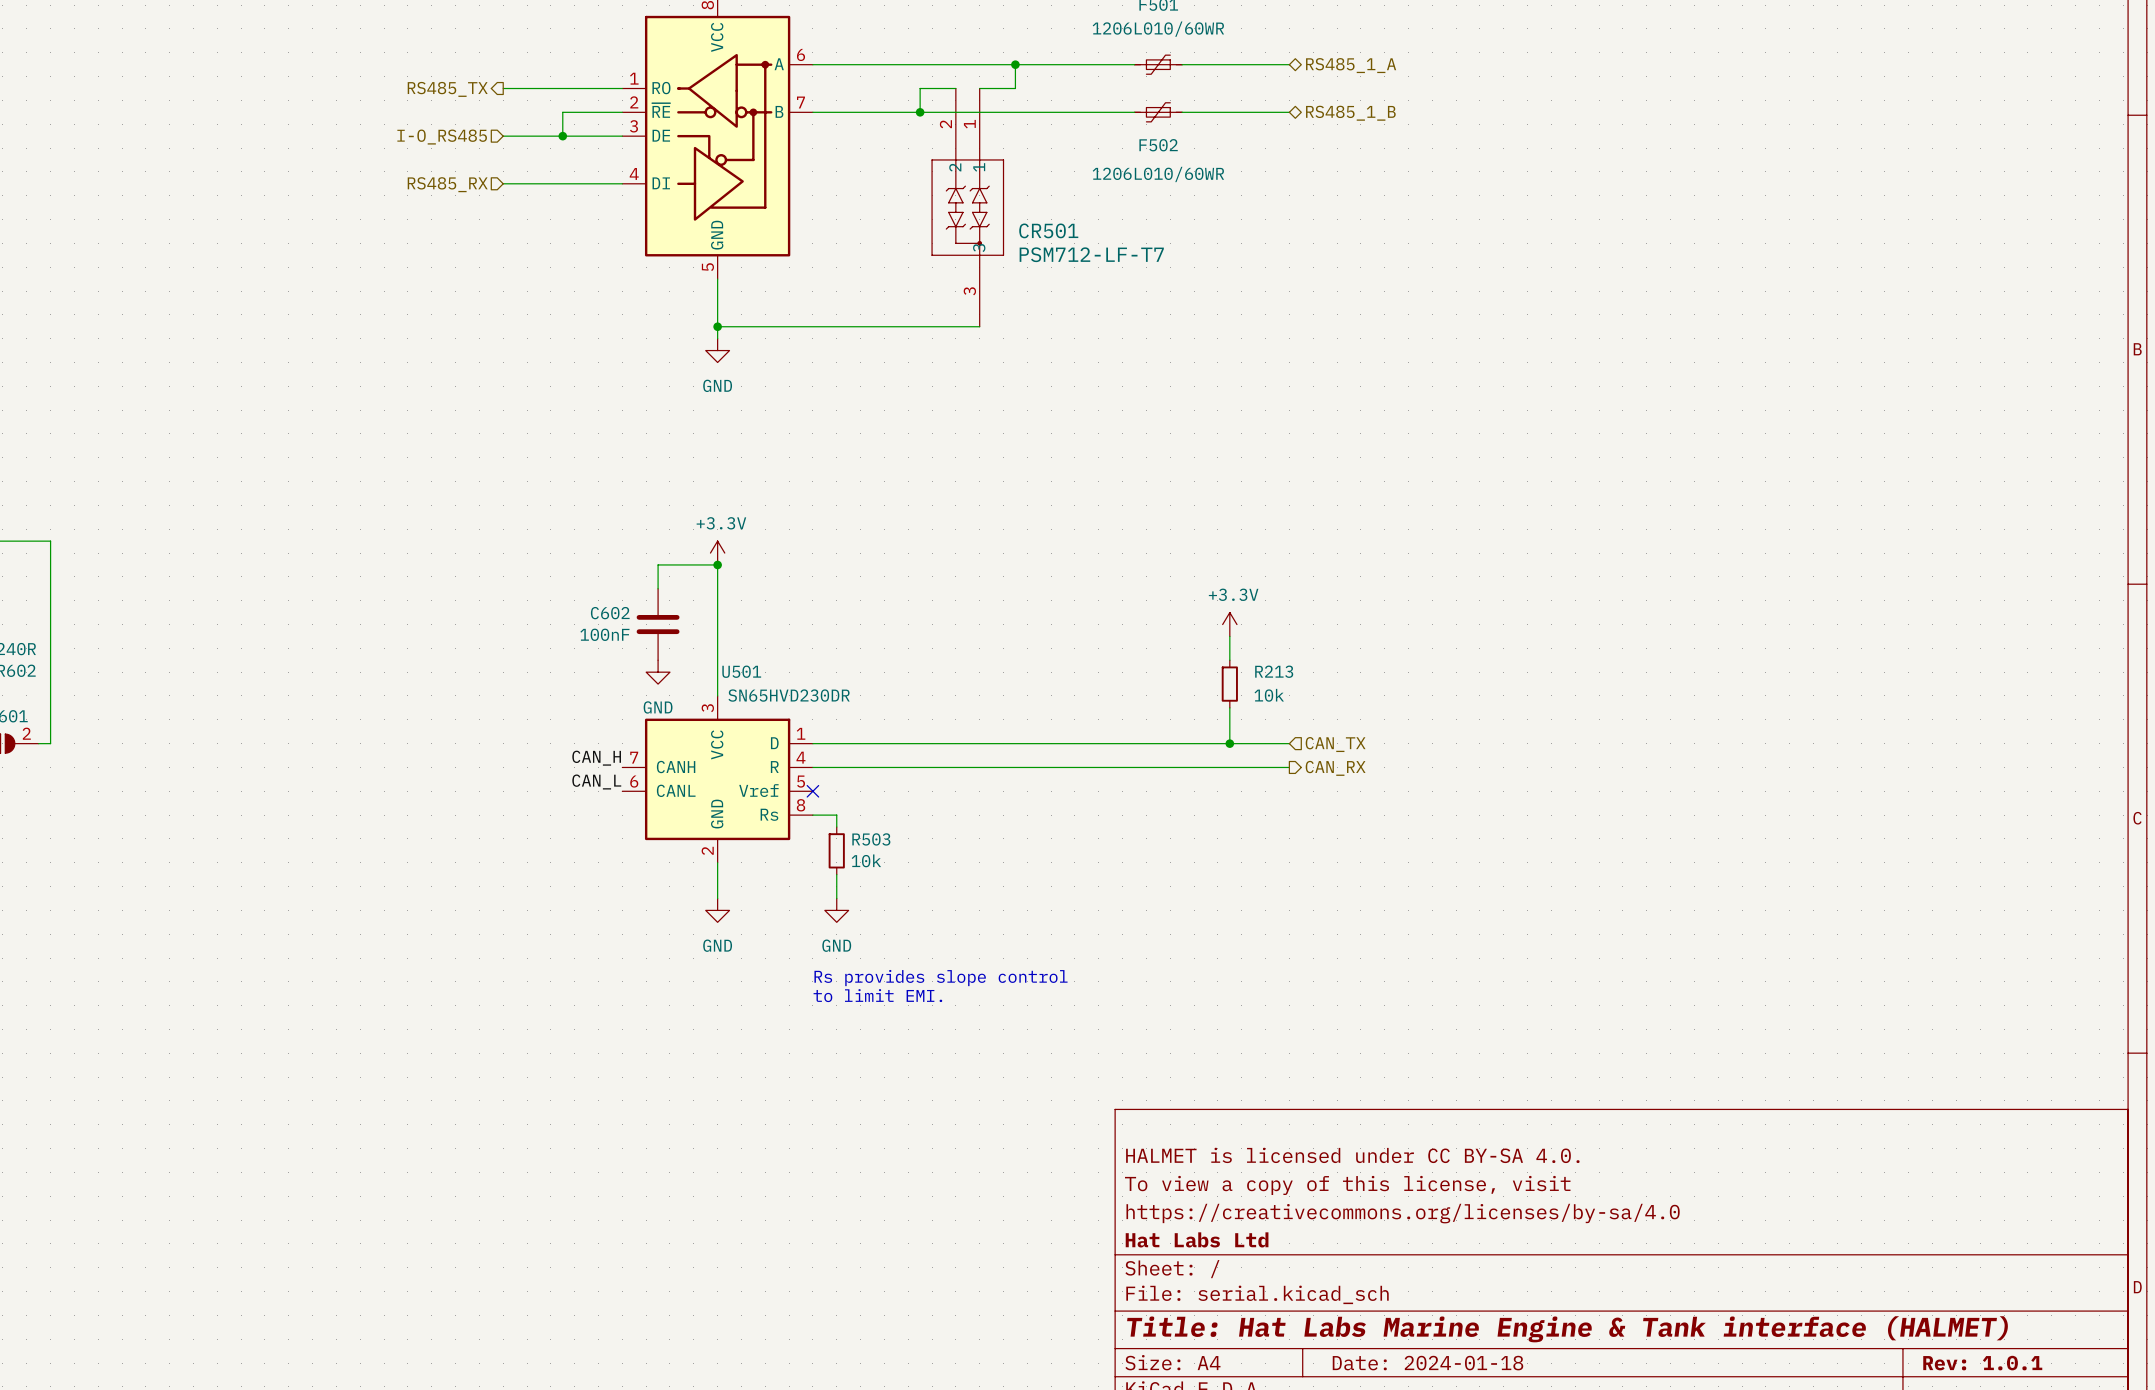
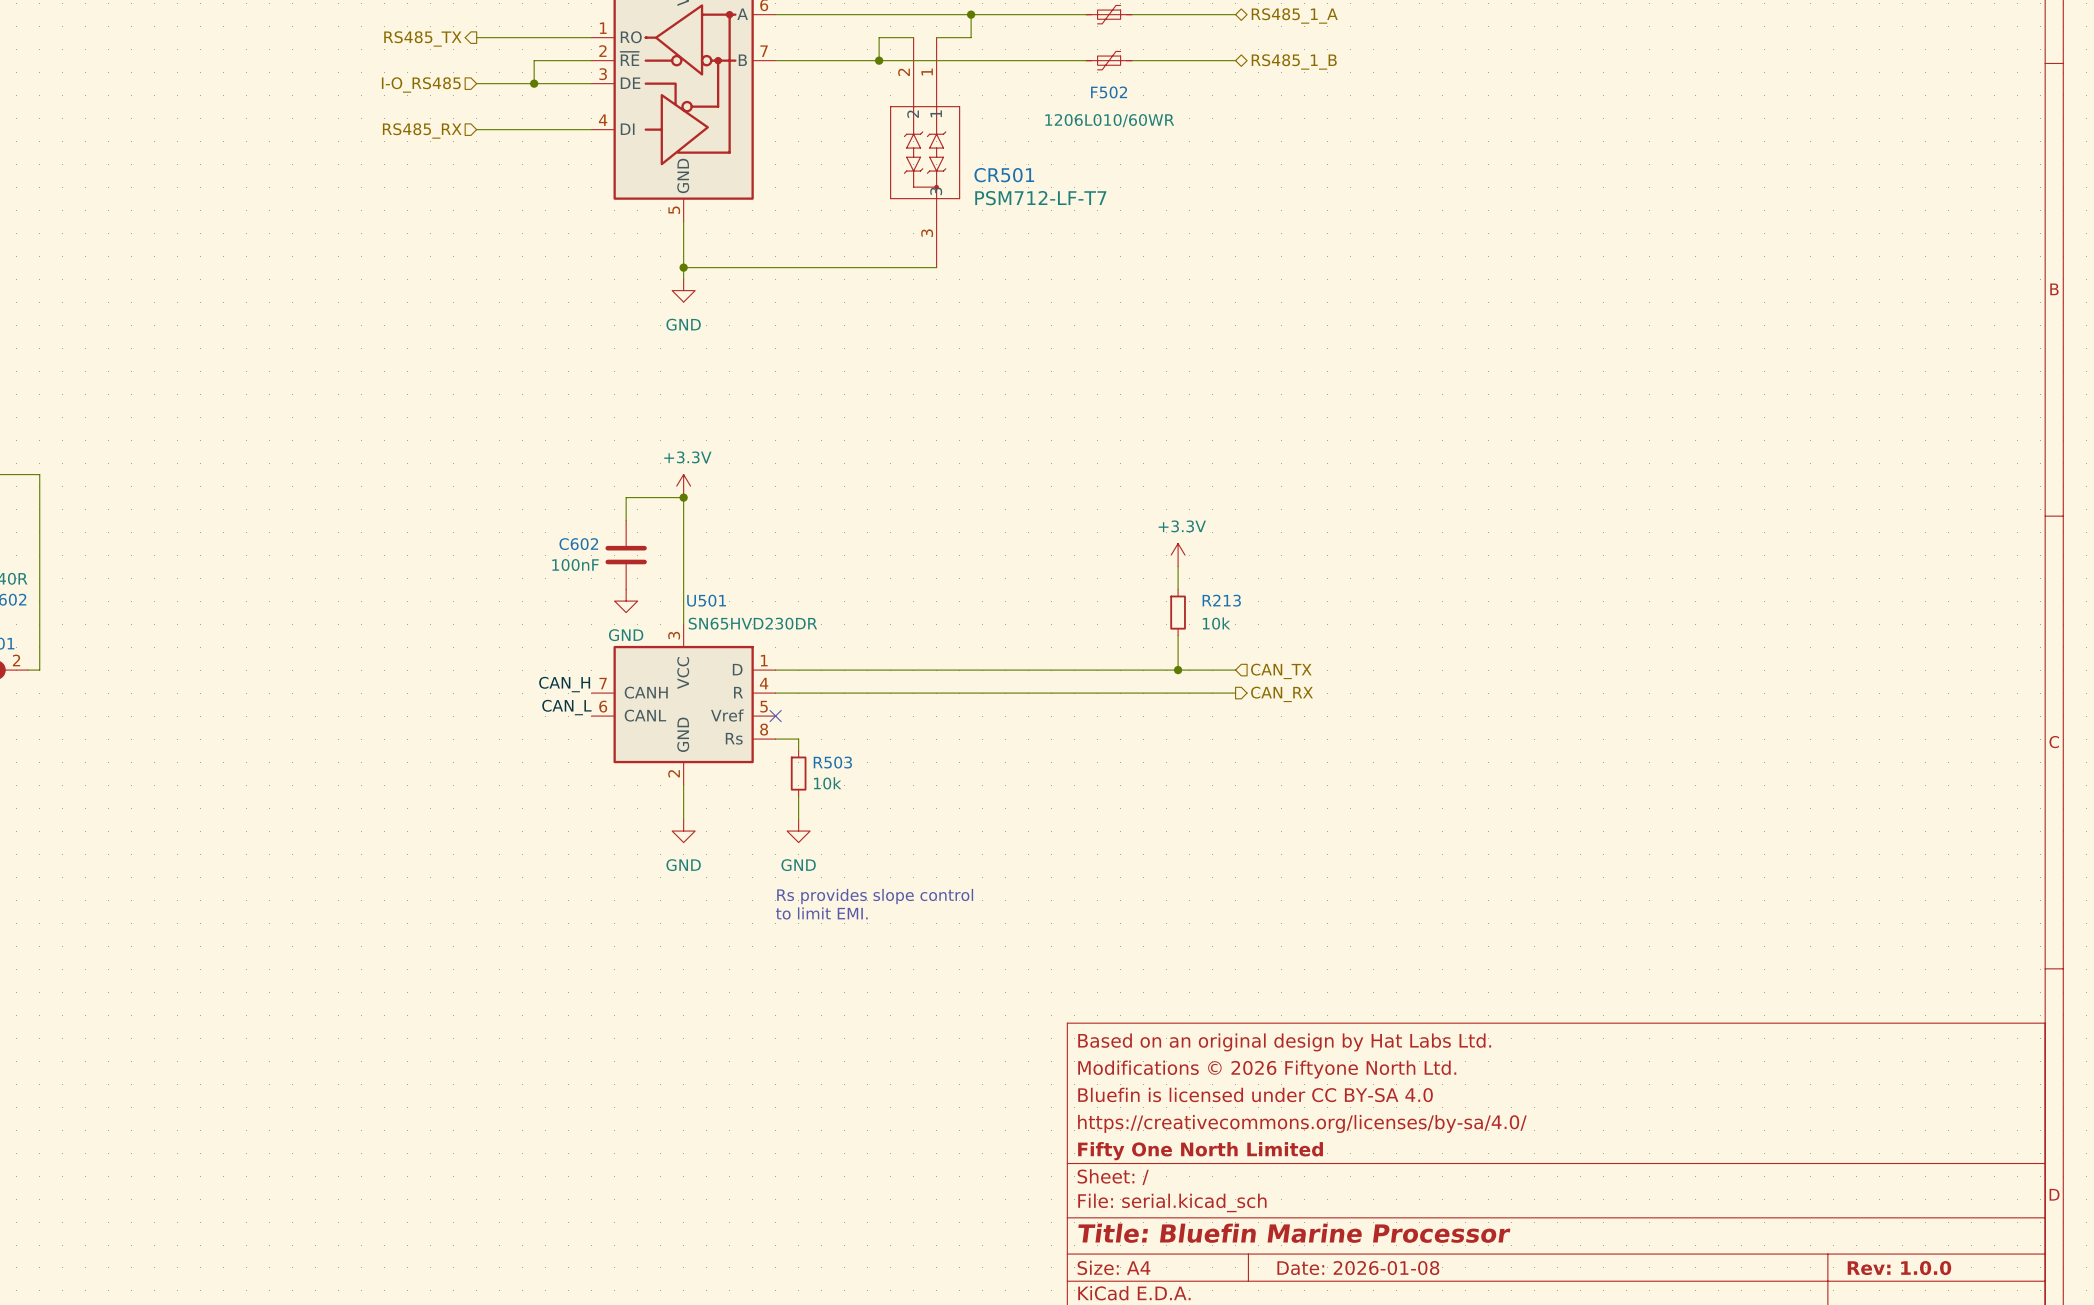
title block: none -> Based on an original design by Hat Labs Ltd. (1284, 1042)
title block: HALMET is licensed under CC BY-SA 4.0. (1352, 1155) -> Modifications © 2026 Fiftyone North Ltd. (1267, 1069)
title block: To view a copy of this license, visit (1347, 1185) -> Bluefin is licensed under CC BY-SA 4.0 (1255, 1094)
title block: https://creativecommons.org/licenses/by-sa/4.0 (1403, 1213) -> https://creativecommons.org/licenses/by-sa/4.0/ (1302, 1123)
title block: Hat Labs Ltd (1197, 1239) -> Fifty One North Limited (1200, 1151)
title block: Title: Hat Labs Marine Engine & Tank interface (HALMET) (1567, 1329) -> Title: Bluefin Marine Processor (1294, 1233)
title block: Date: 2024-01-18 (1427, 1363) -> Date: 2026-01-08 (1358, 1268)
title block: Rev: 1.0.1 (1982, 1363) -> Rev: 1.0.0 (1899, 1268)

